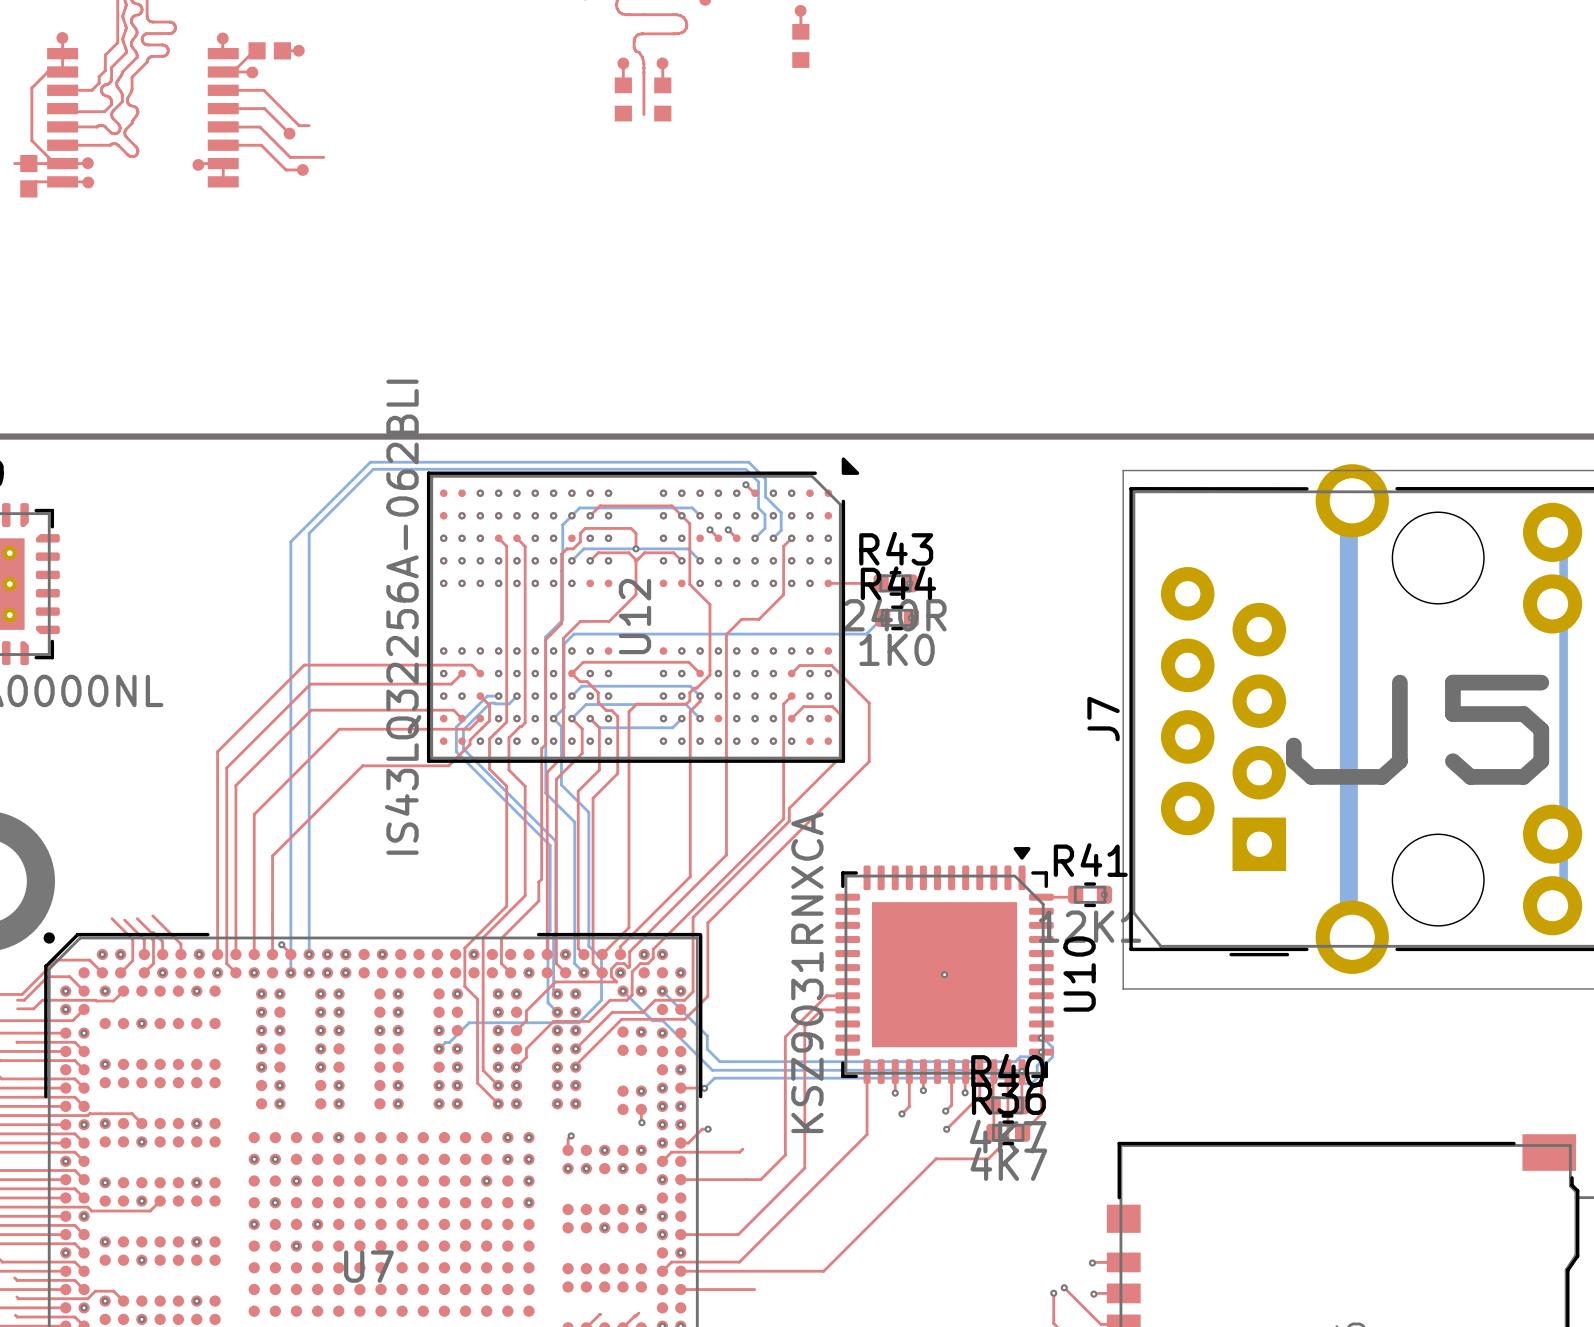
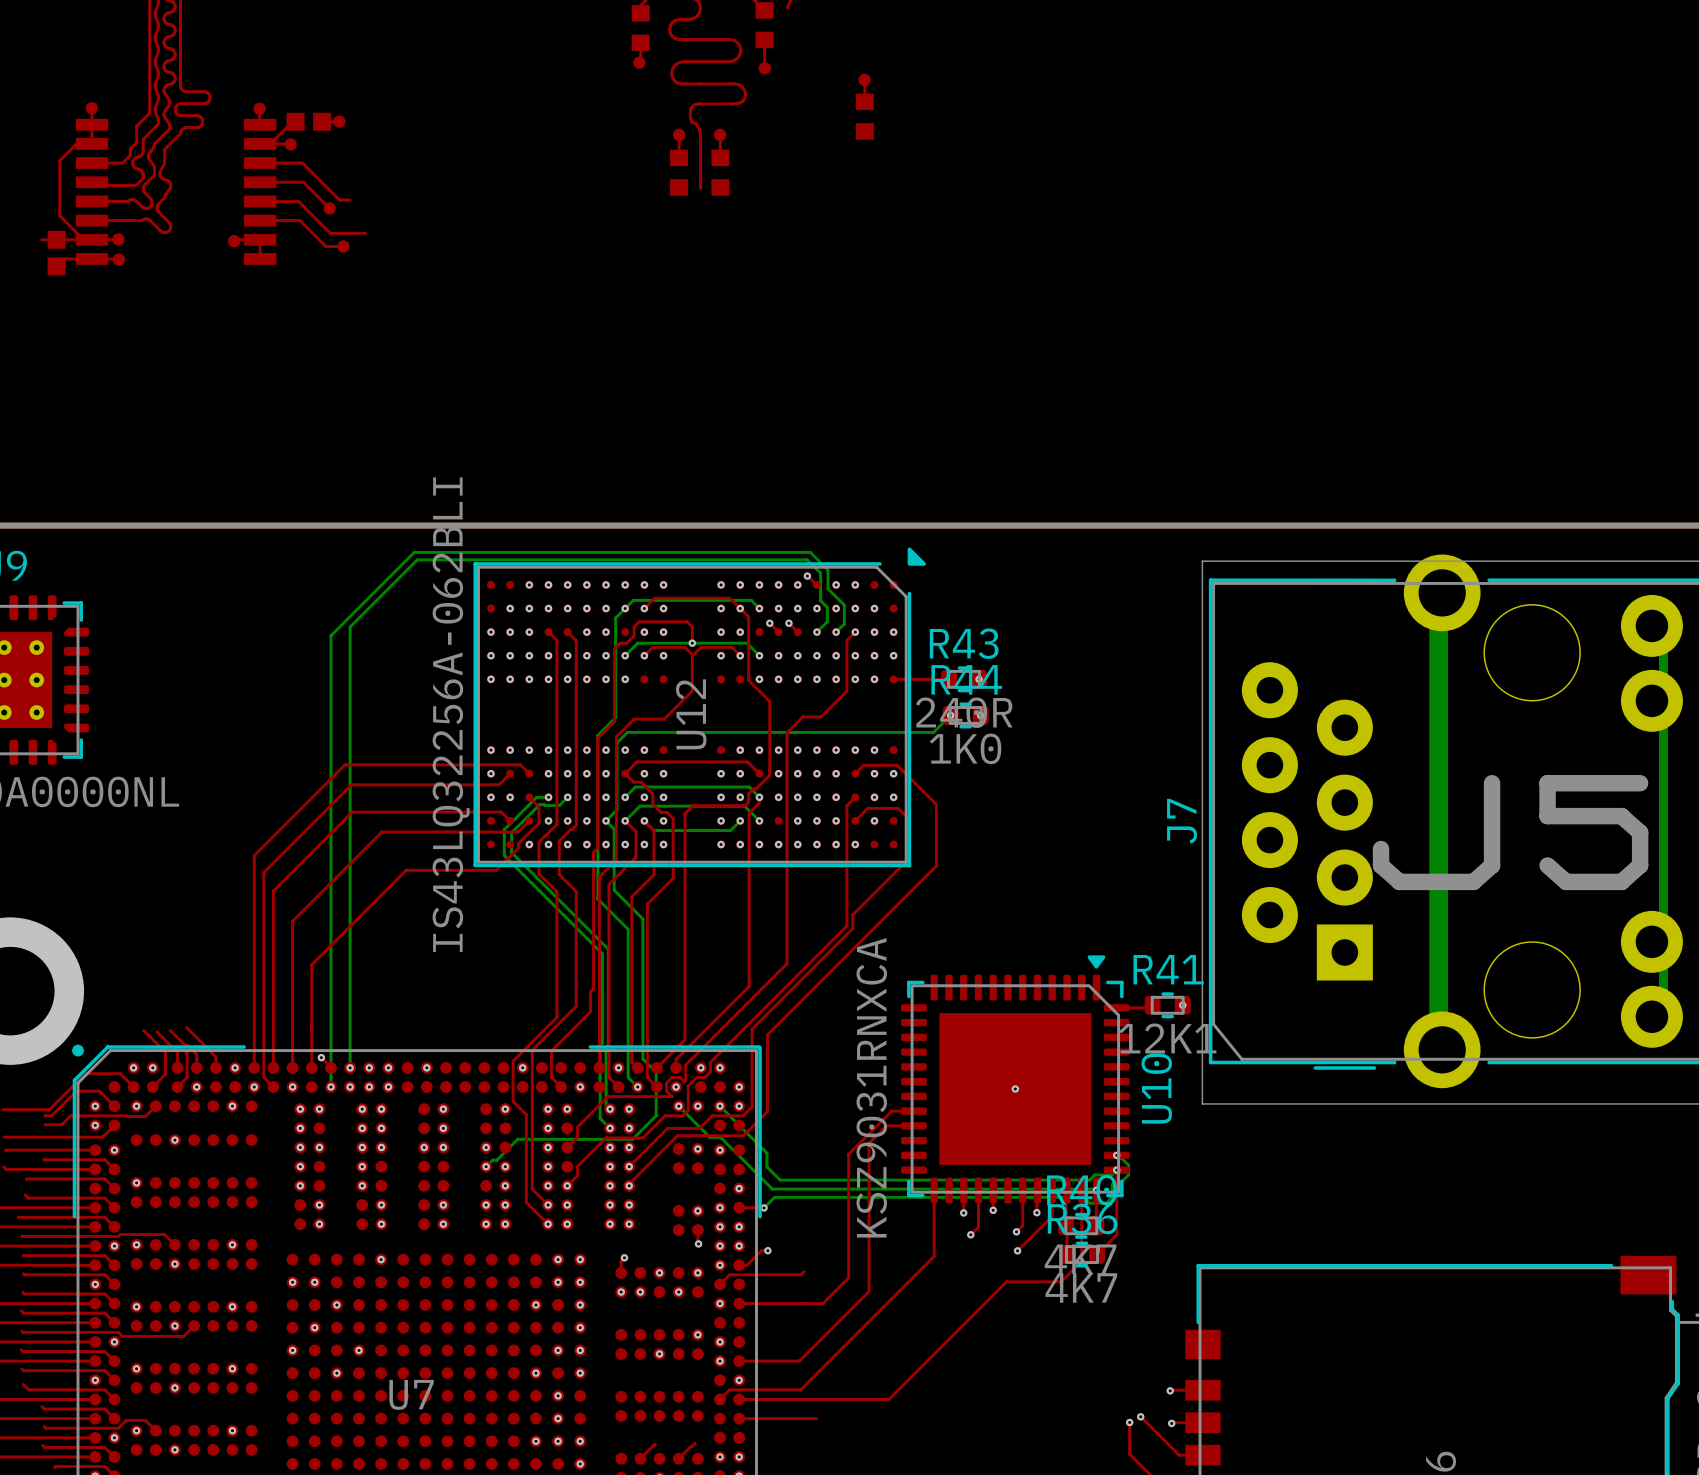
via: none -> (558, 1350)
via: none -> (580, 1350)
via: none -> (535, 1373)
via: none -> (580, 1373)
via: none -> (558, 1395)
via: none -> (558, 1418)
via: none -> (535, 1441)
via: none -> (558, 1441)
via: none -> (580, 1441)

